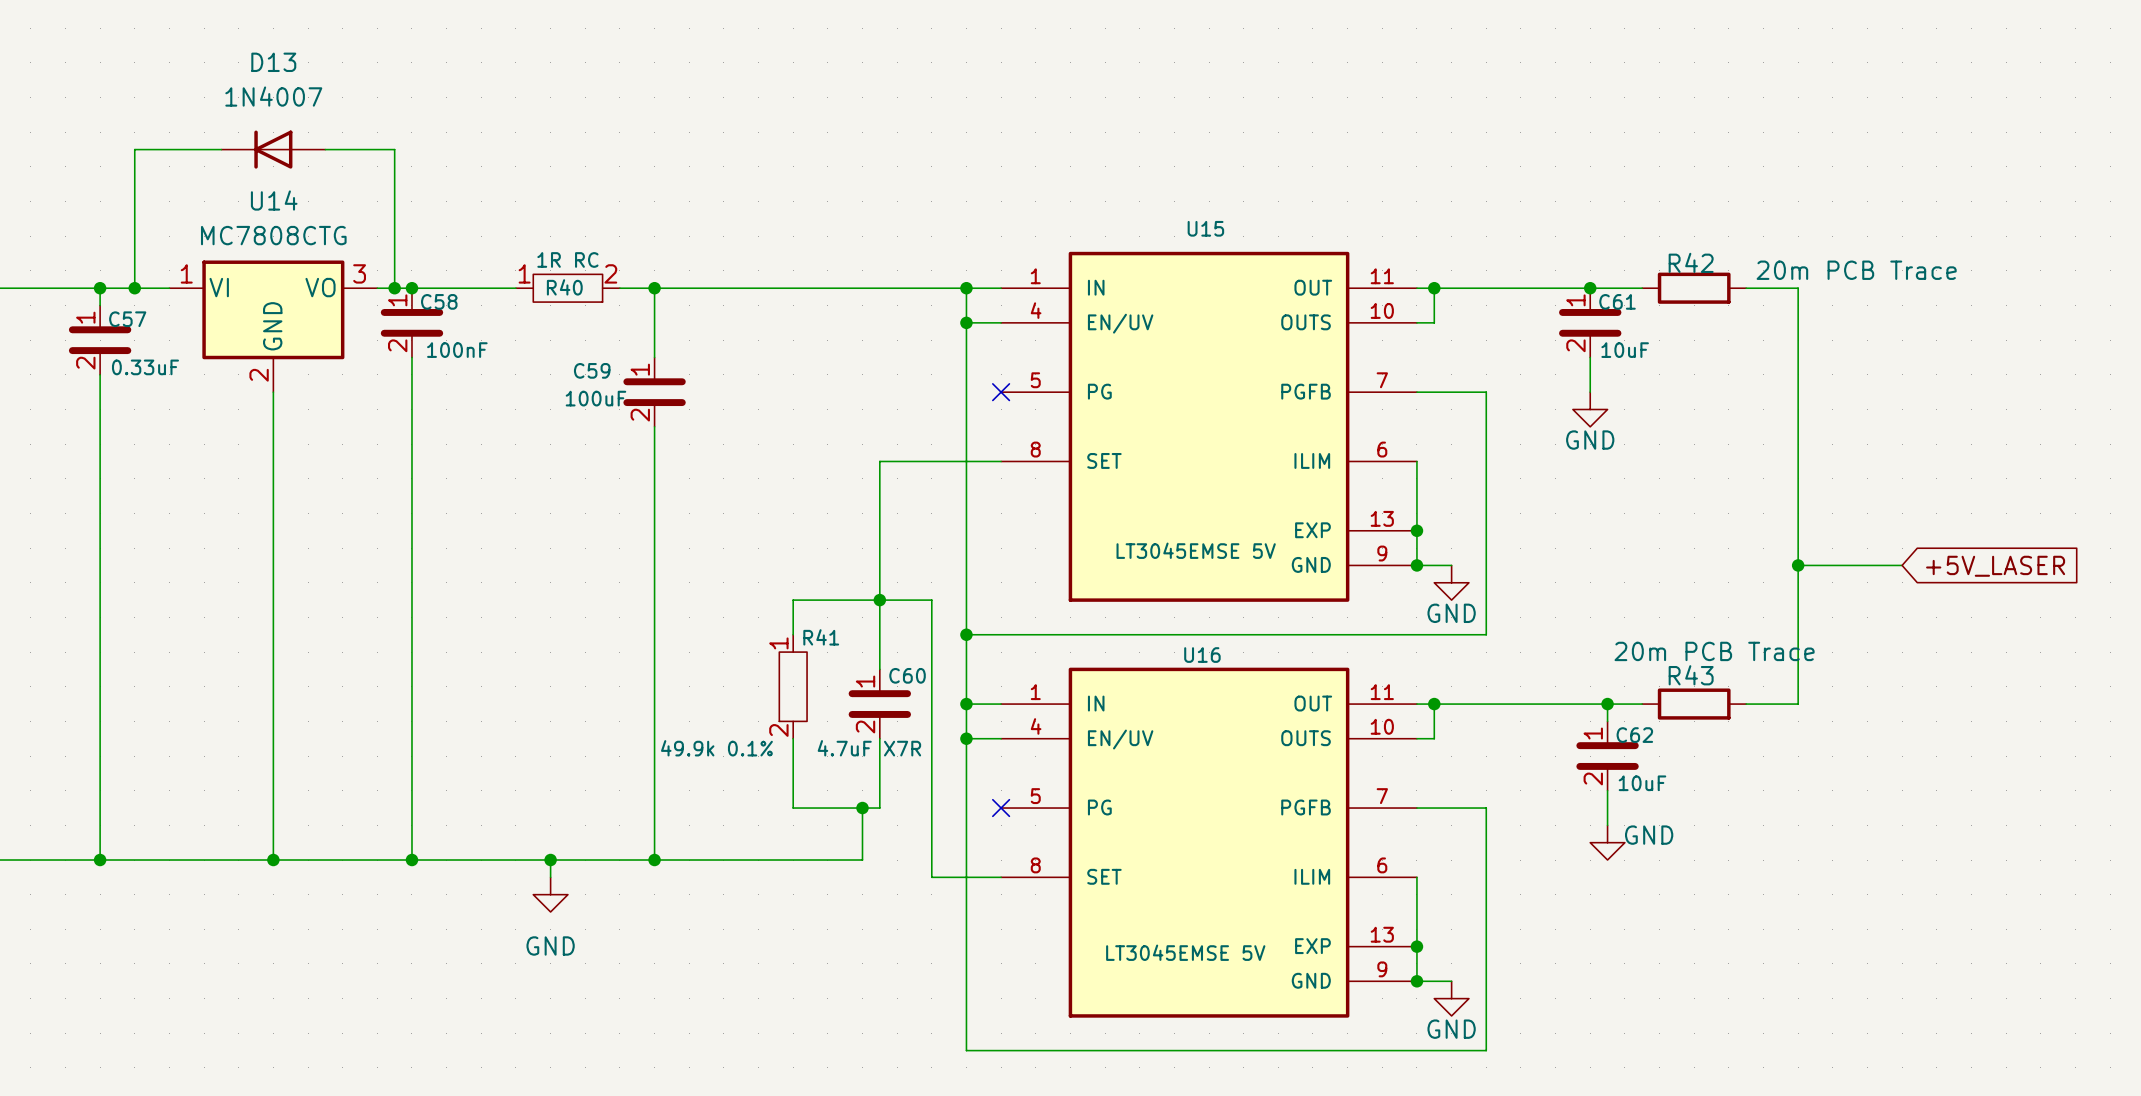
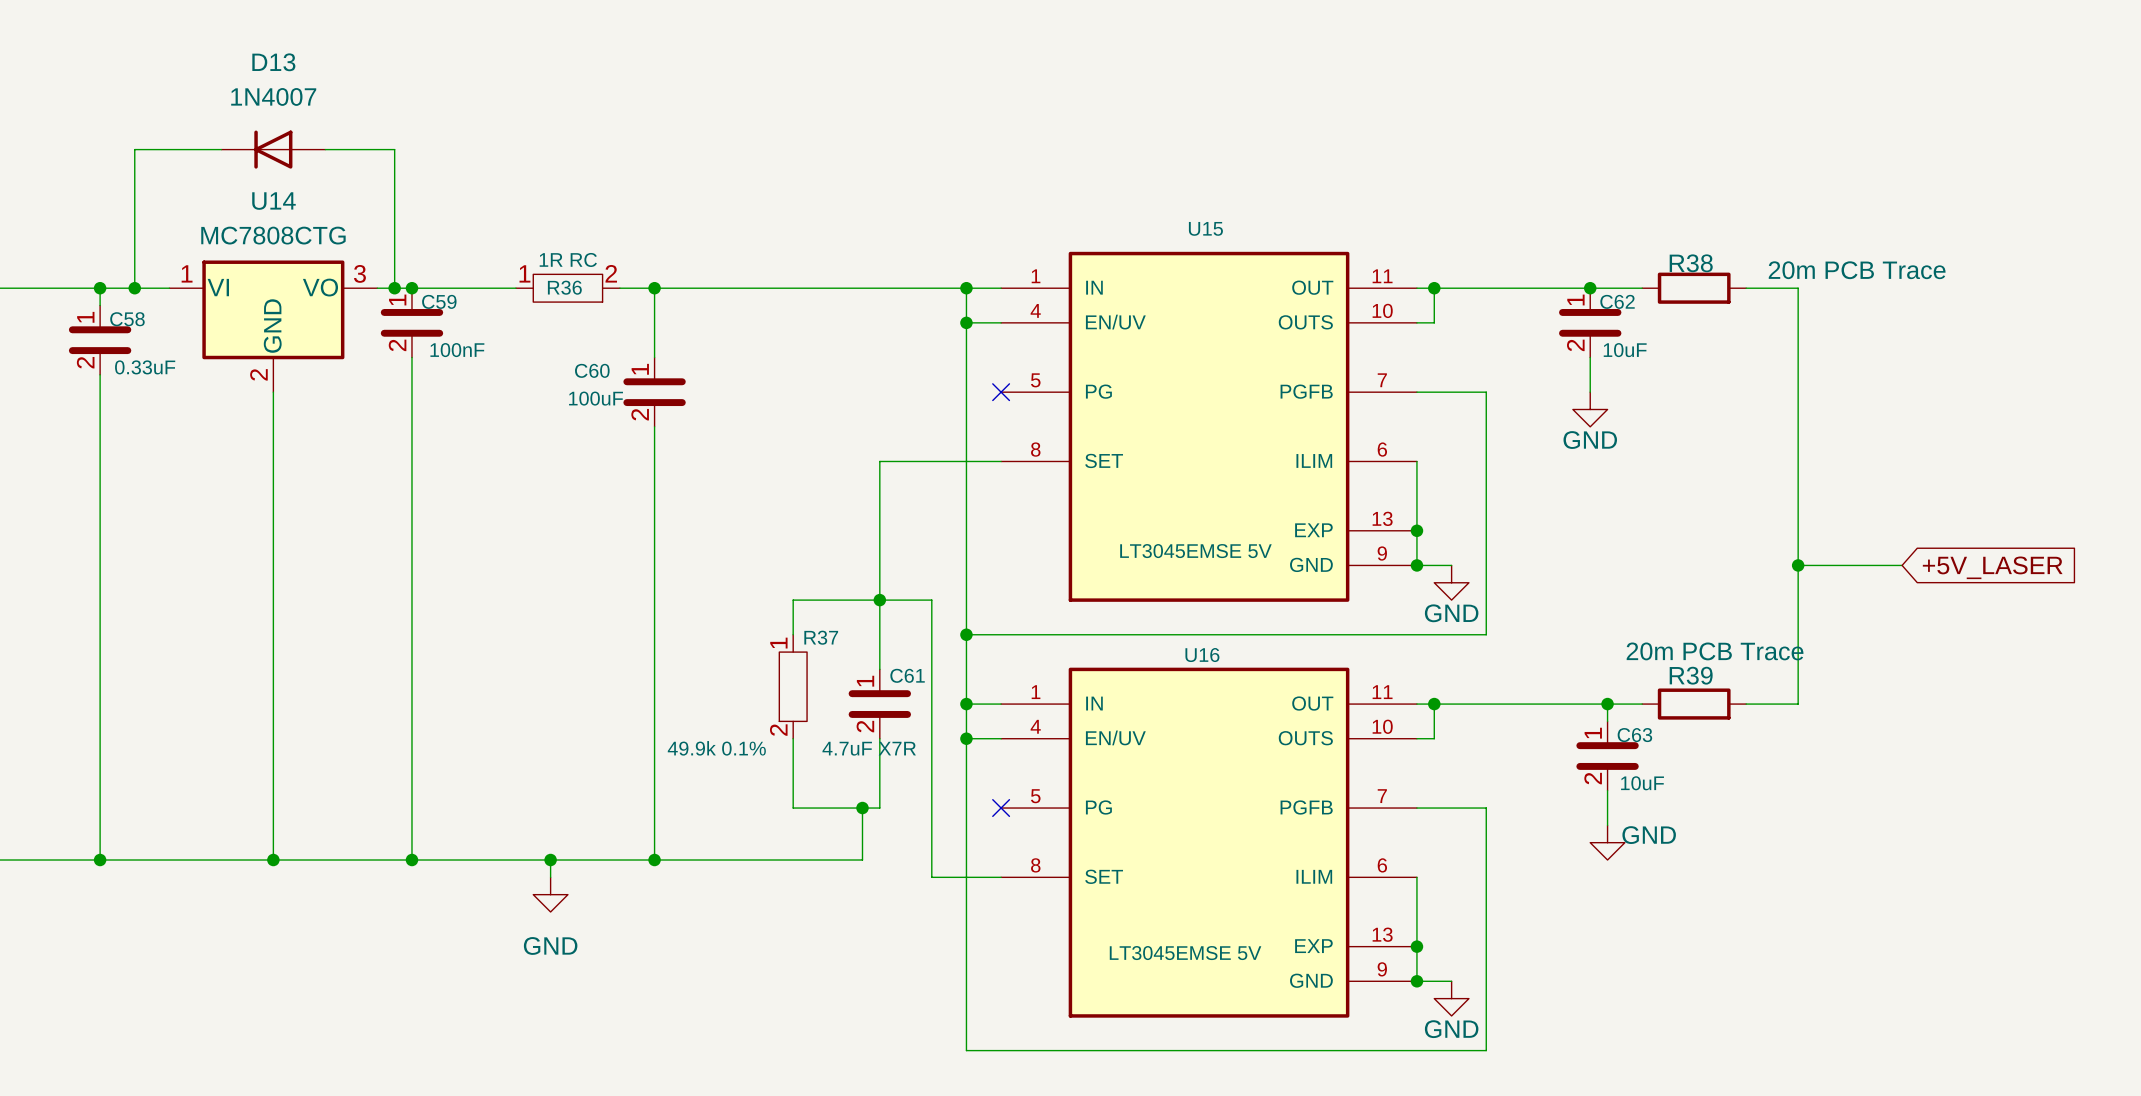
R42 name: R42 (1691, 262) -> R38 (1691, 263)
R40 name: R40 (564, 287) -> R36 (564, 287)
C58 name: C58 (439, 301) -> C59 (439, 301)
C61 name: C61 (1617, 301) -> C62 (1617, 301)
C57 name: C57 (127, 319) -> C58 (127, 319)
C59 name: C59 (592, 370) -> C60 (592, 370)
R41 name: R41 (821, 637) -> R37 (821, 637)
C60 name: C60 (907, 675) -> C61 (907, 675)
R43 name: R43 (1691, 675) -> R39 (1691, 675)
C62 name: C62 (1634, 735) -> C63 (1634, 735)

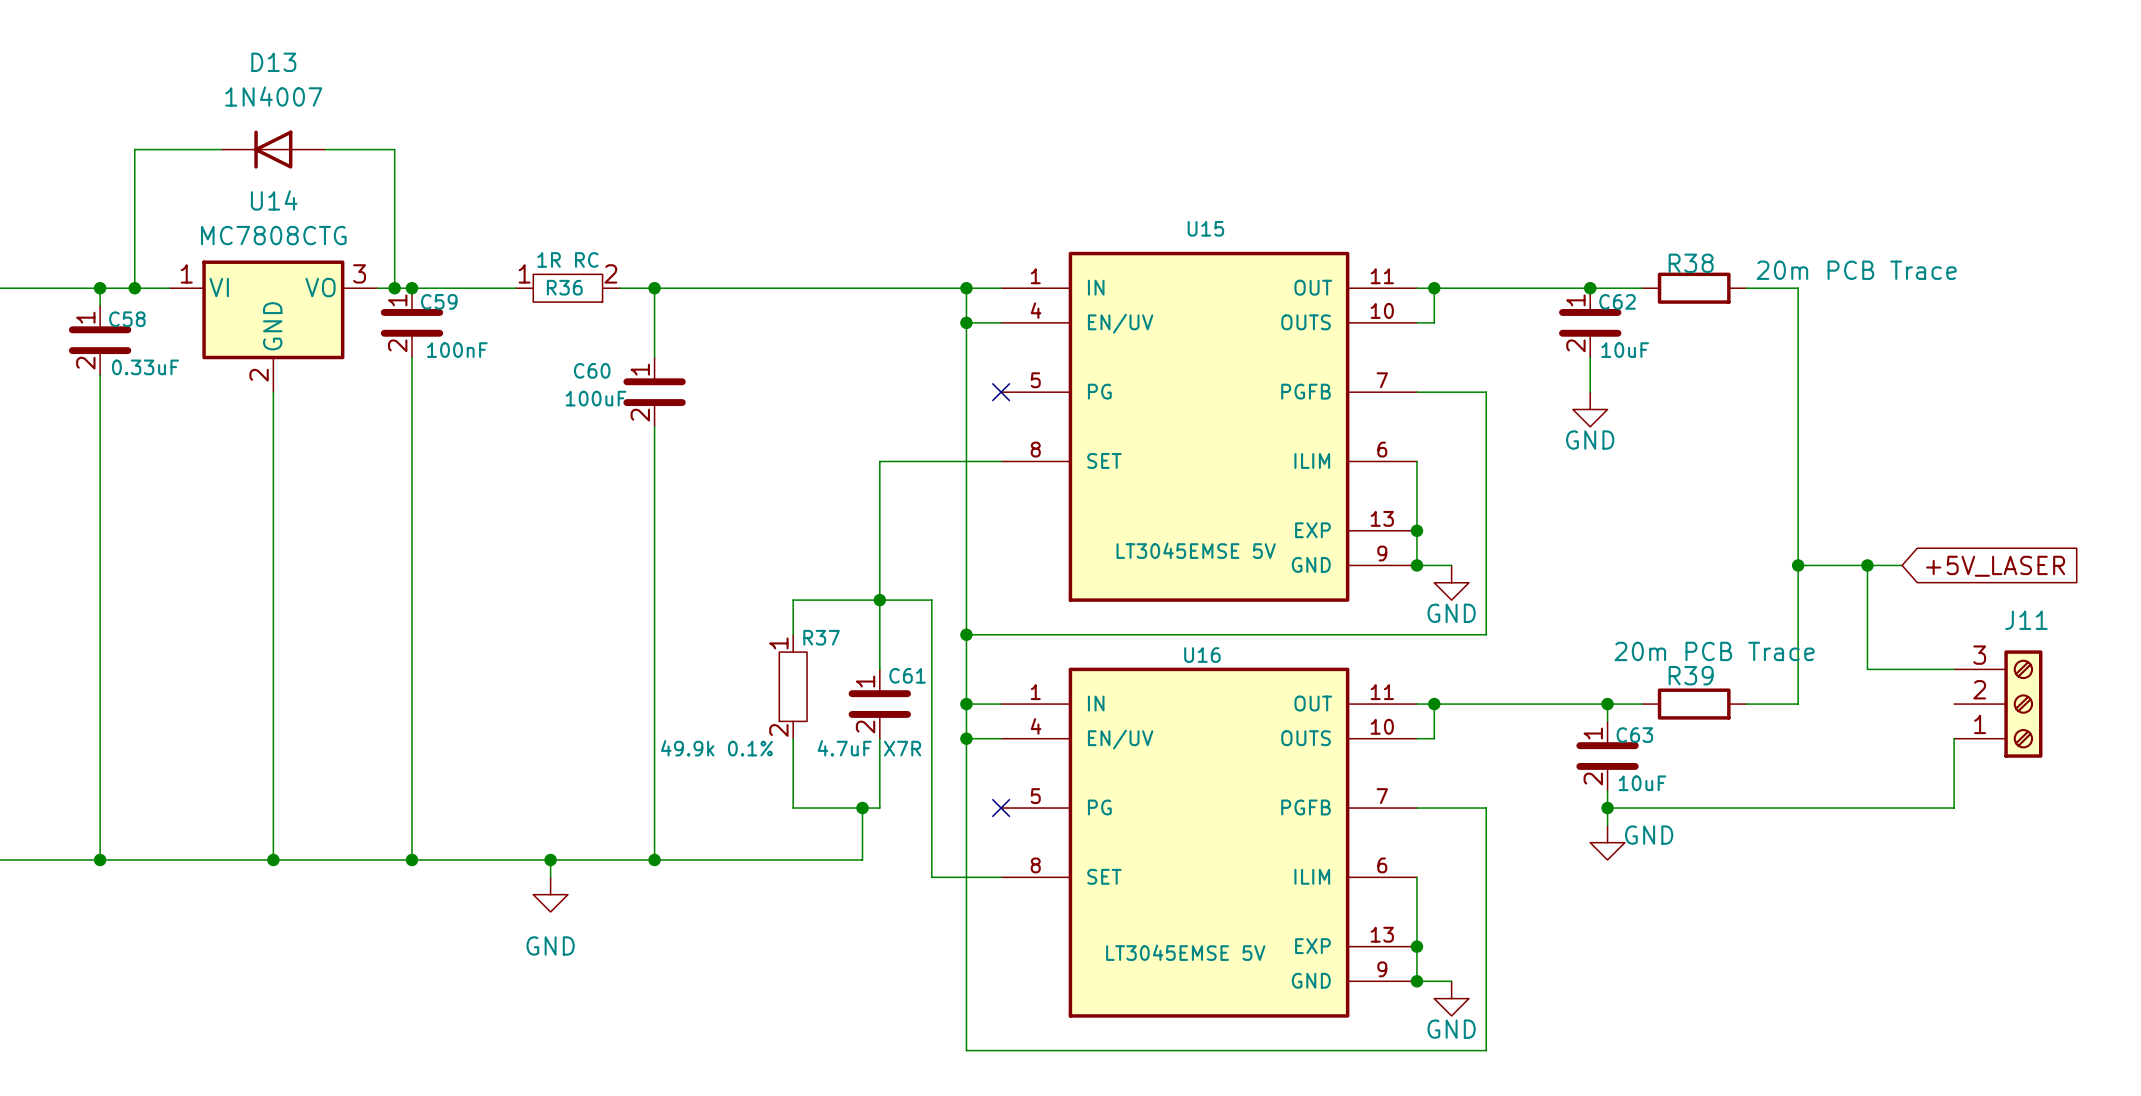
wire: none -> (1867, 565) (1867, 669) (1954, 669)
junction: none -> (1867, 565)
J11: none -> (1998, 704)
wire: none -> (1954, 738) (1954, 808) (1607, 808)
junction: none -> (1607, 808)

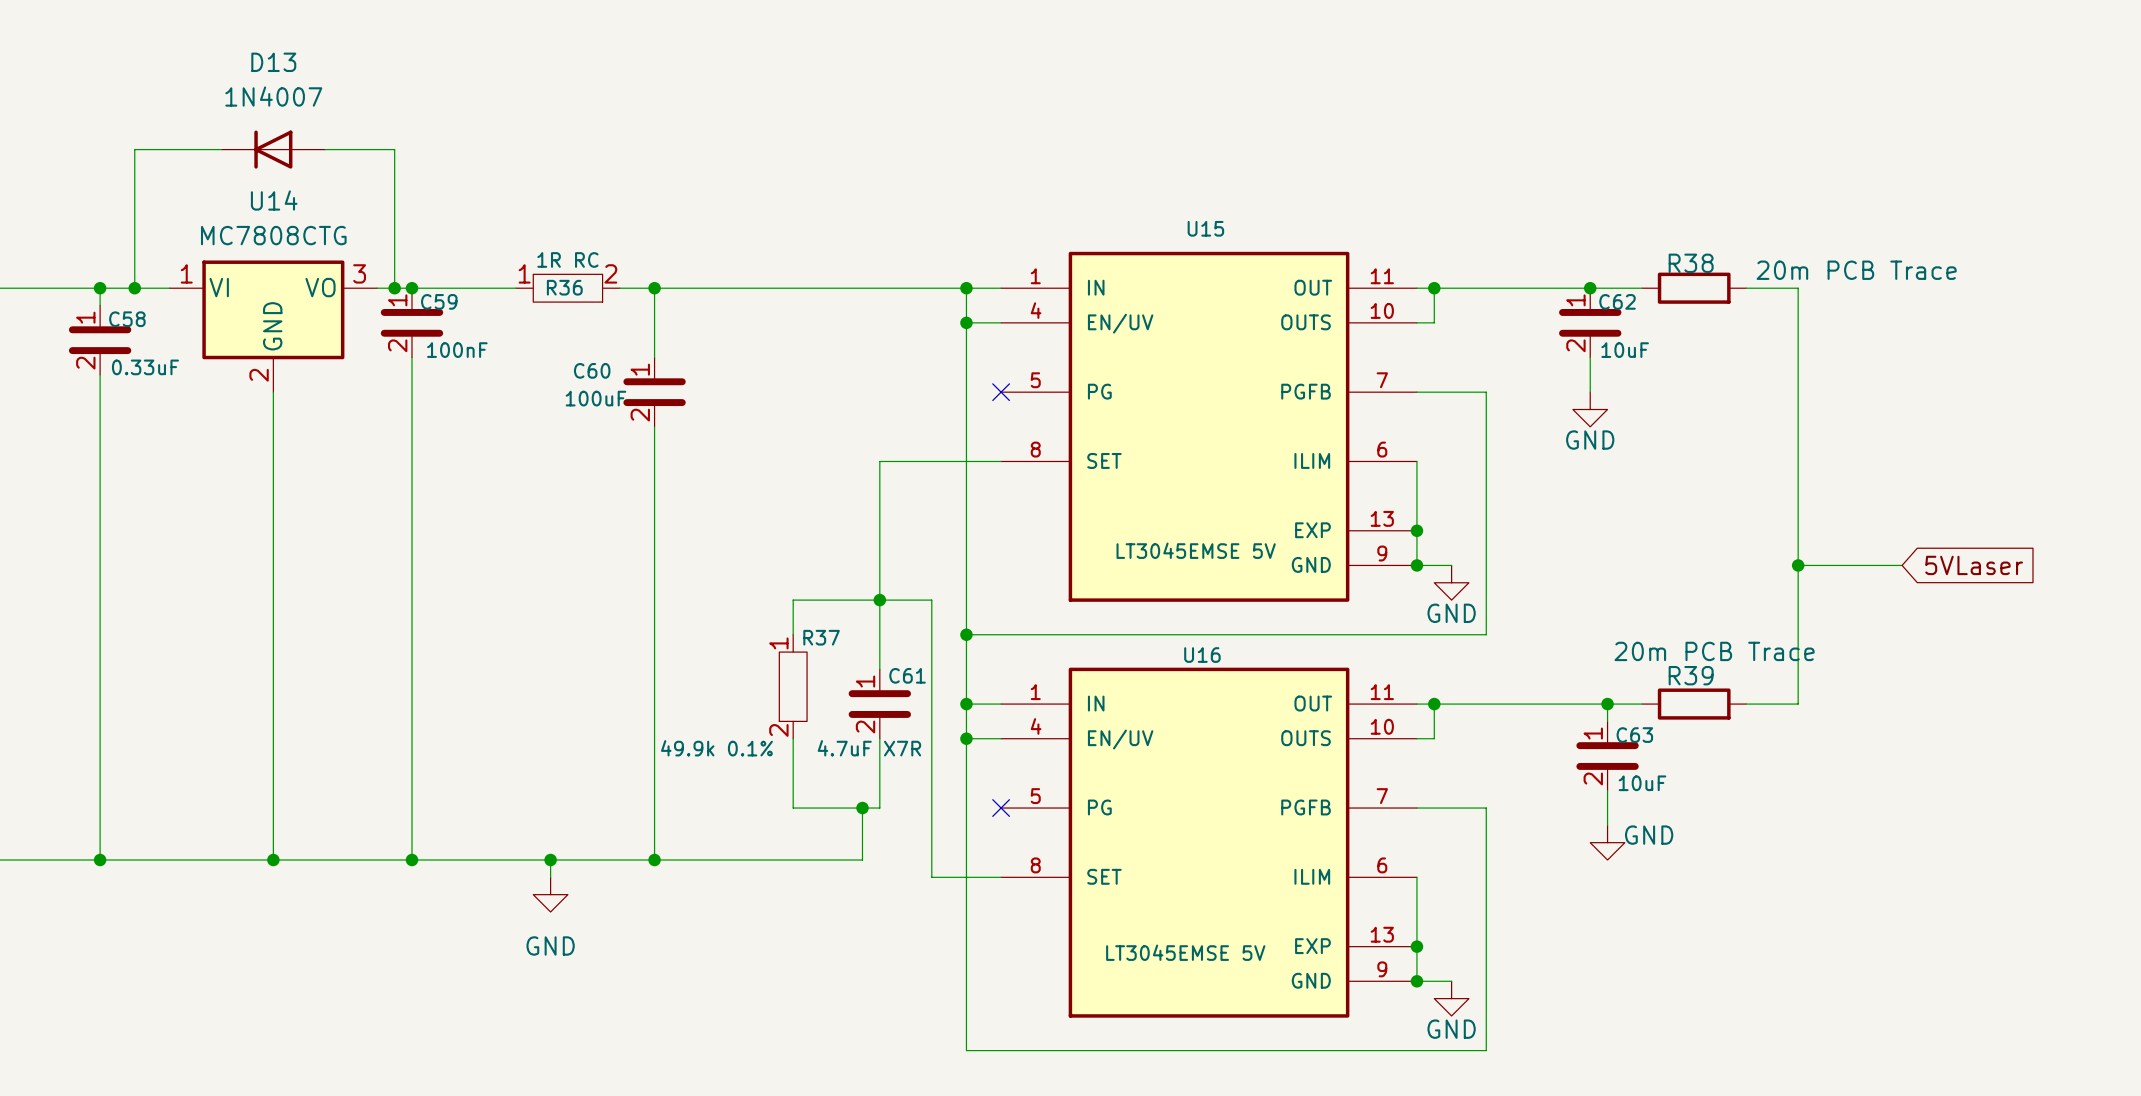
wire: (1867, 565) (1867, 669) (1954, 669) -> none
junction: (1867, 565) -> none
global label: +5V_LASER (1995, 566) -> 5VLaser (1974, 565)
J11: (1998, 704) -> none
wire: (1954, 738) (1954, 808) (1607, 808) -> none
junction: (1607, 808) -> none

